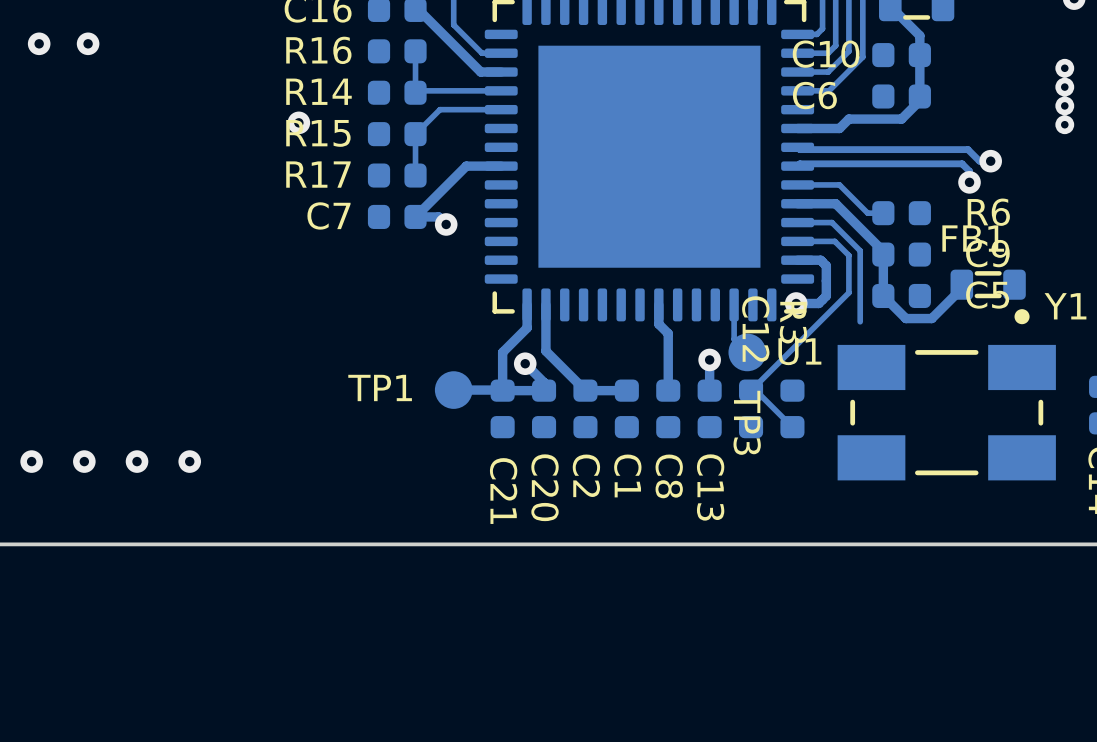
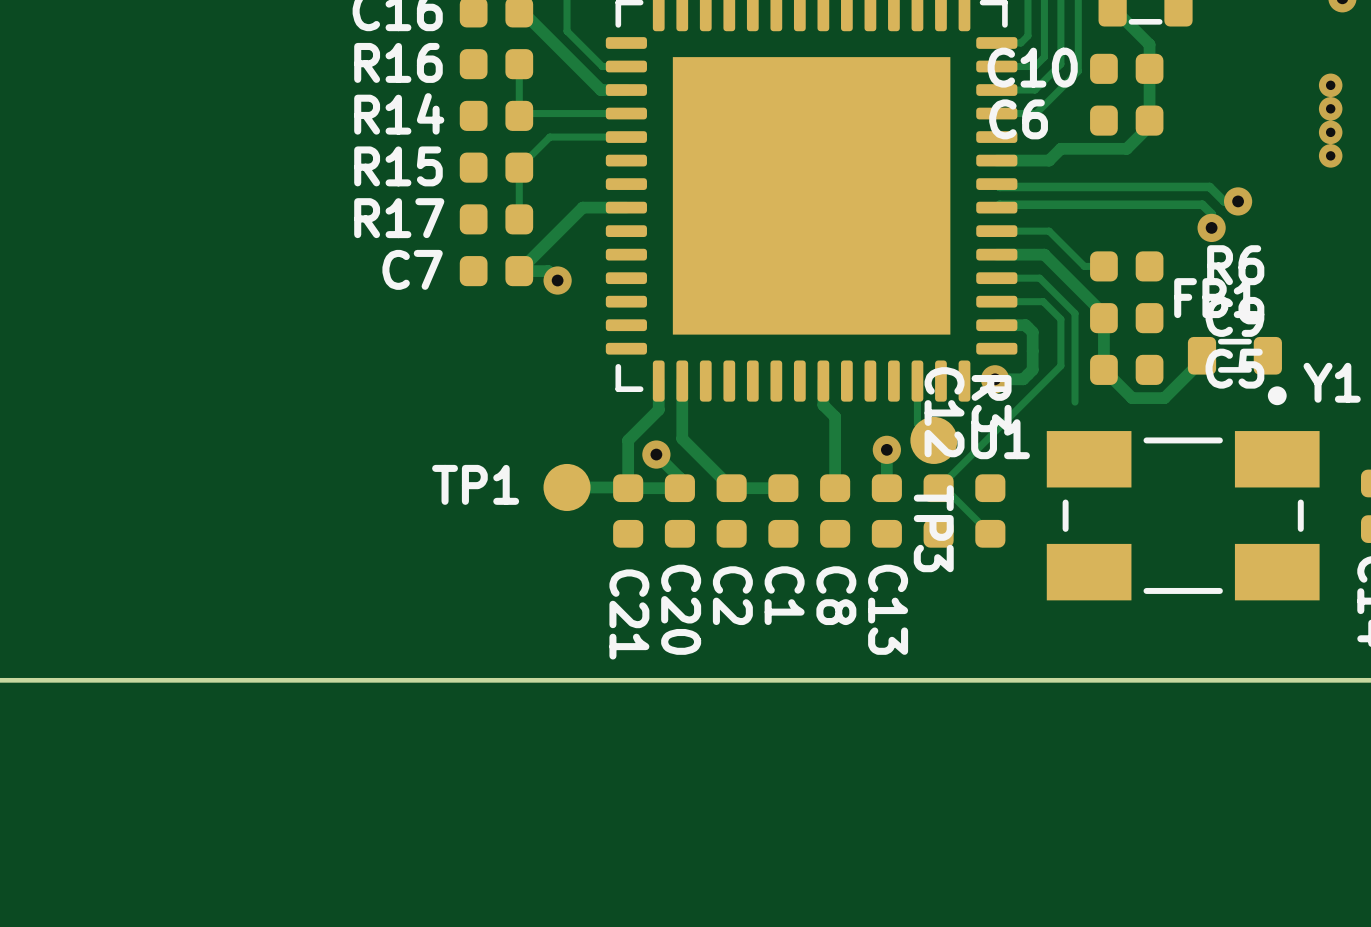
via: (39, 43) -> none
via: (88, 43) -> none
via: (298, 122) -> none
via: (31, 461) -> none
via: (84, 461) -> none
via: (137, 461) -> none
via: (189, 461) -> none

